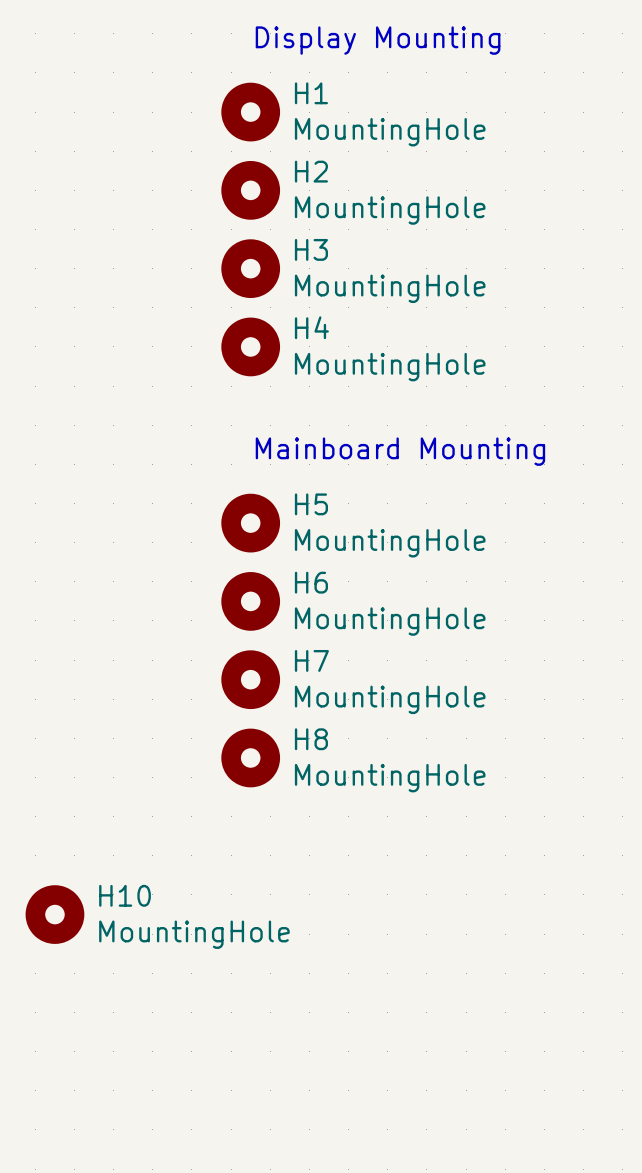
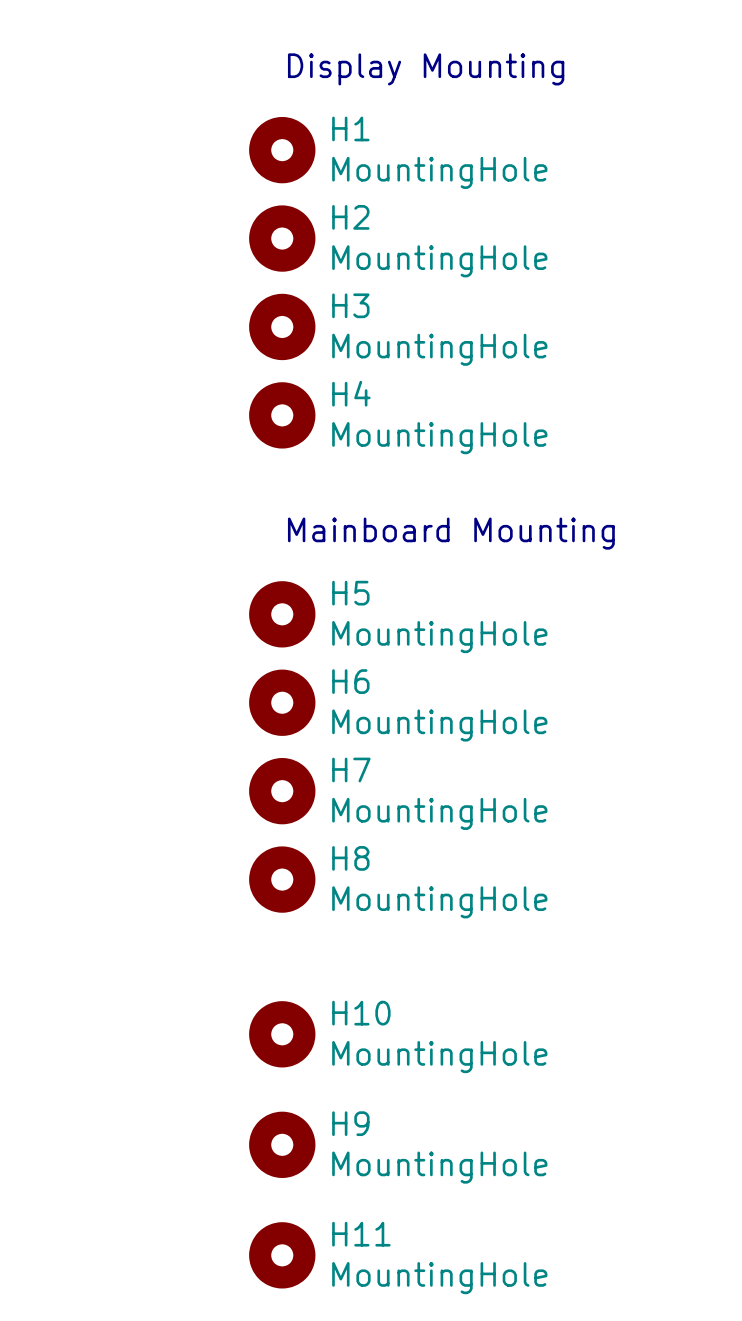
H10 position: (54, 914) -> (282, 1034)
H9: none -> MountingHole (282, 1144)
H11: none -> MountingHole (282, 1255)

